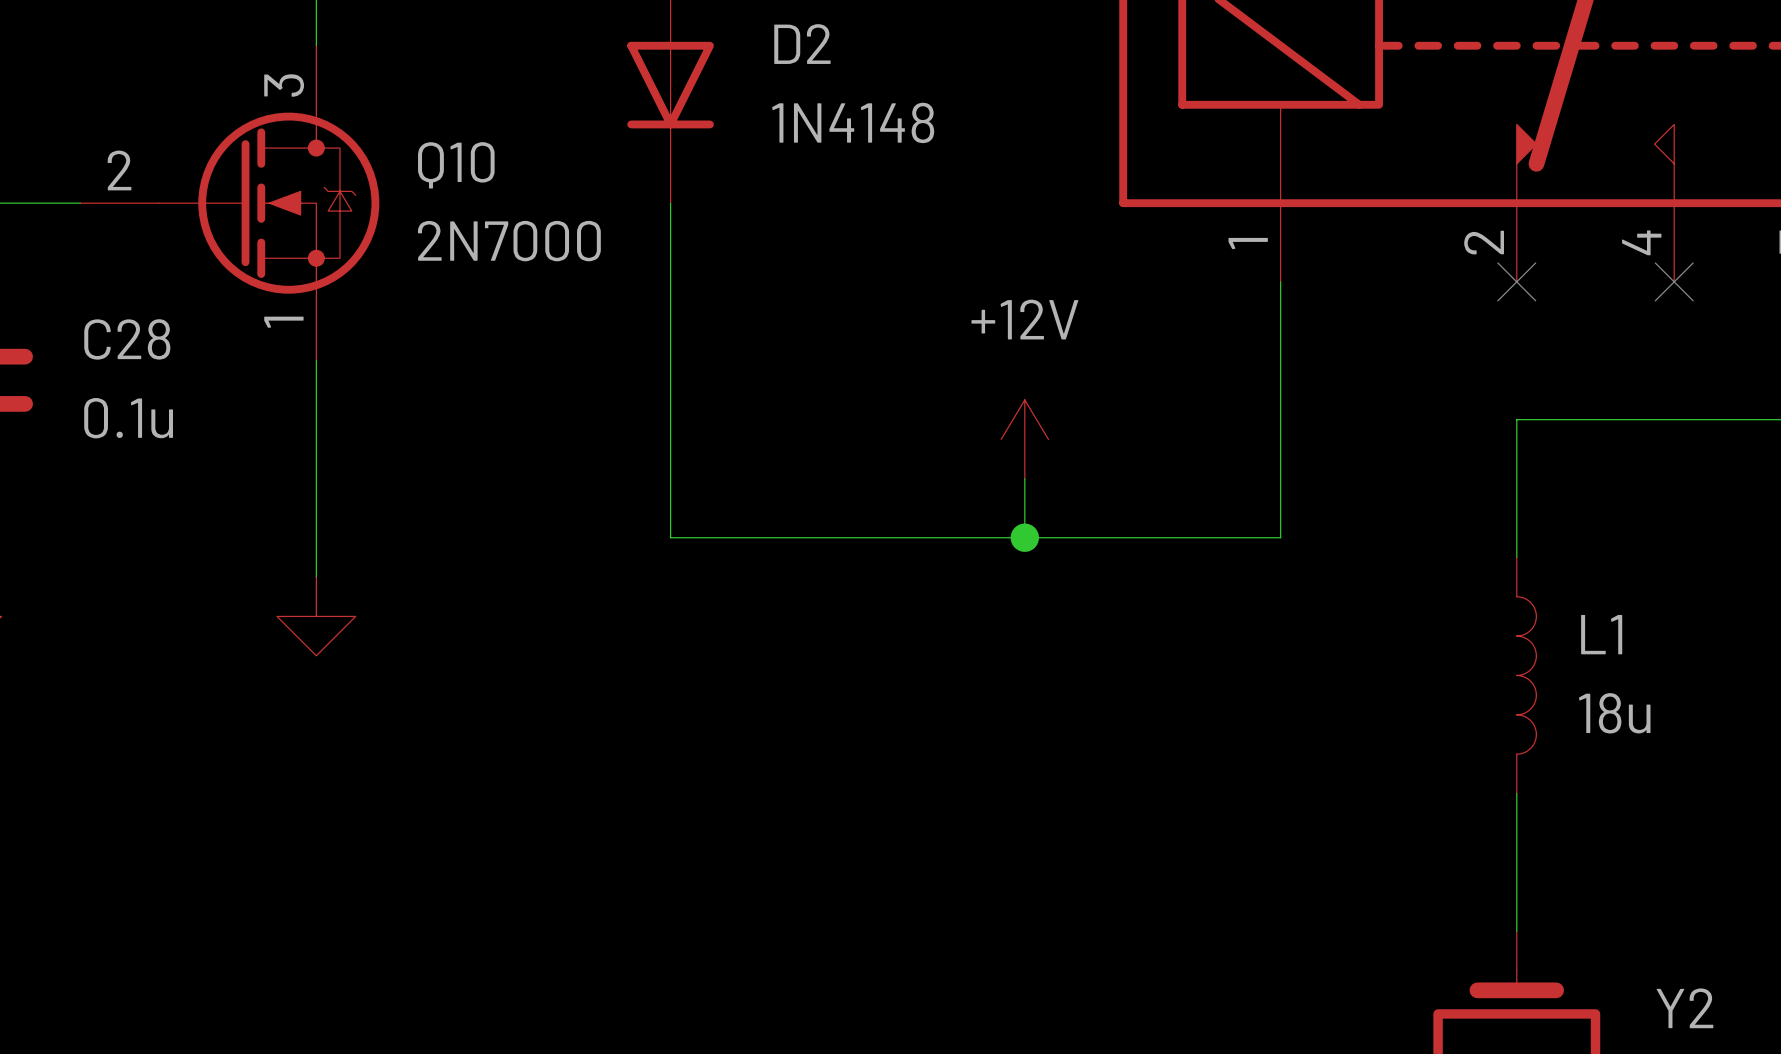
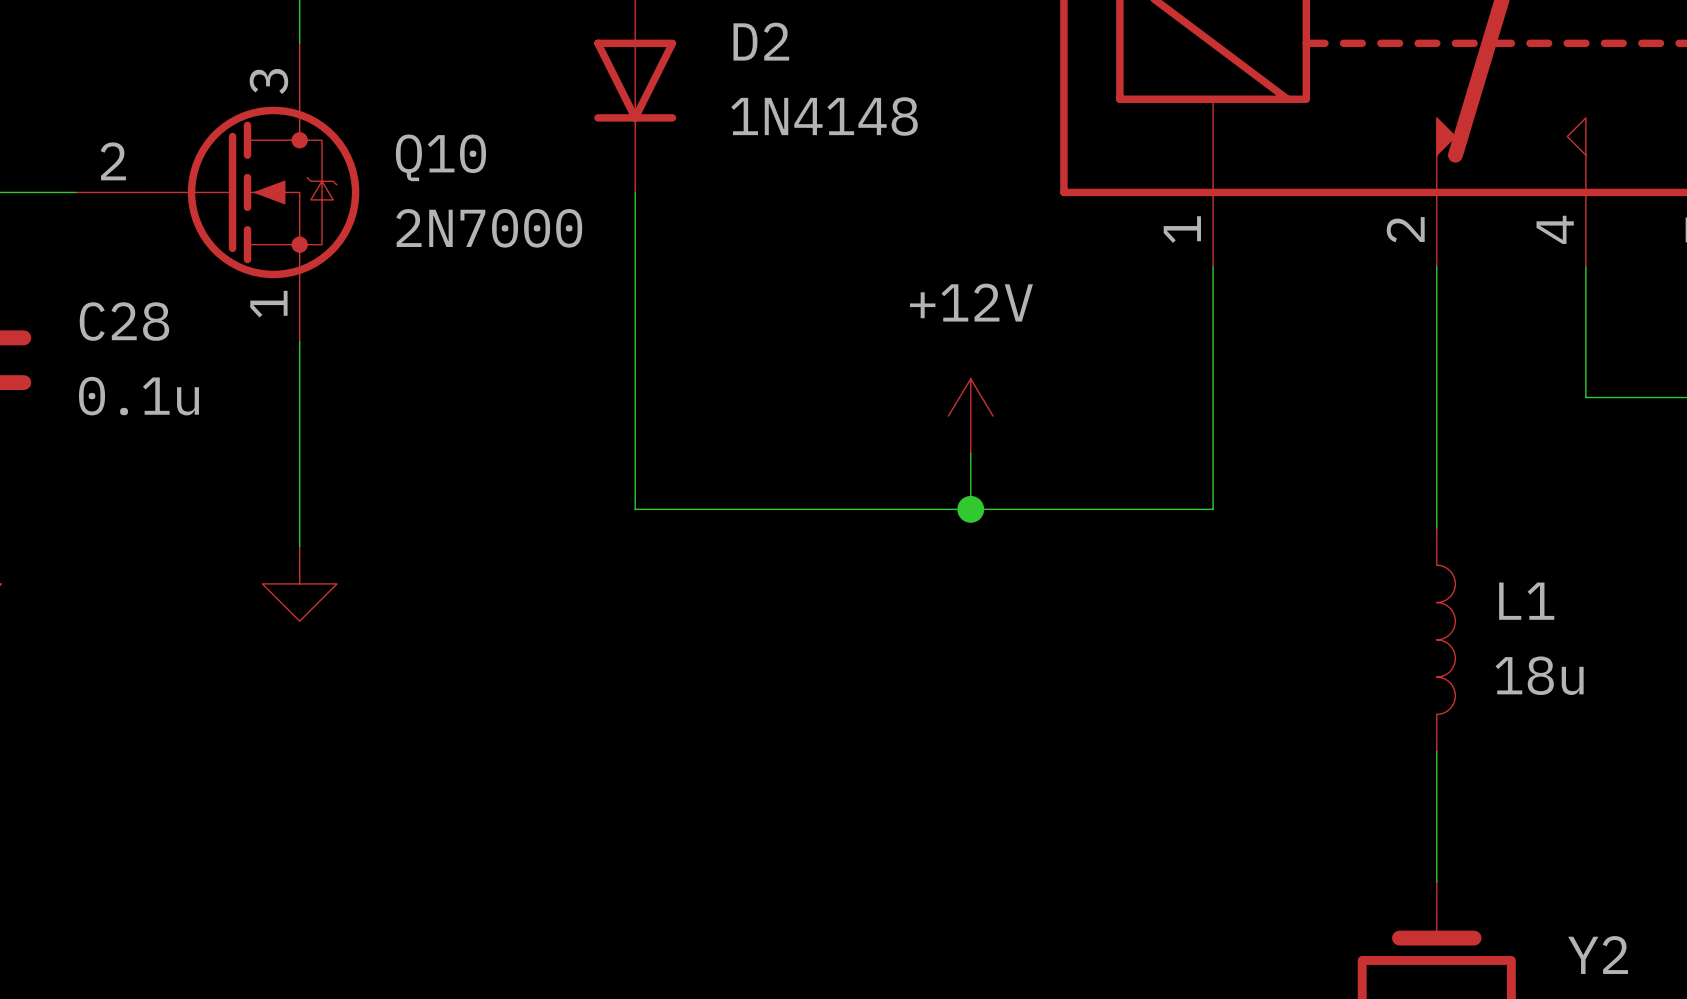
no-connect mark: (1516, 281) -> none
wire: none -> (1585, 267) (1585, 397)
no-connect mark: (1674, 281) -> none
wire: (1516, 419) (1674, 419) -> (1436, 397) (1436, 267)

